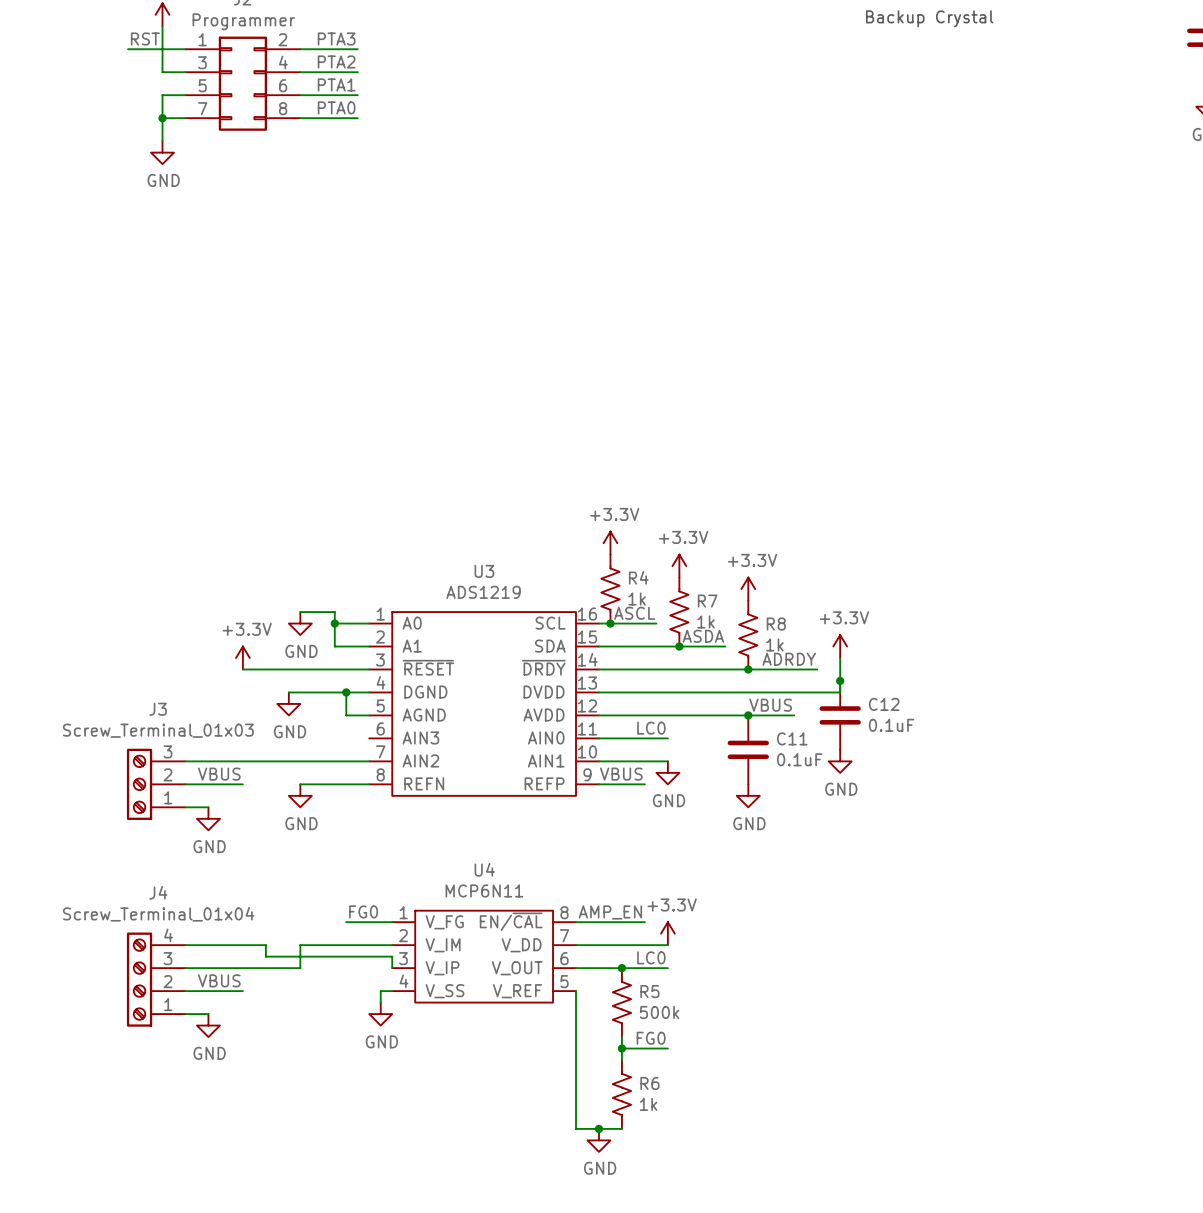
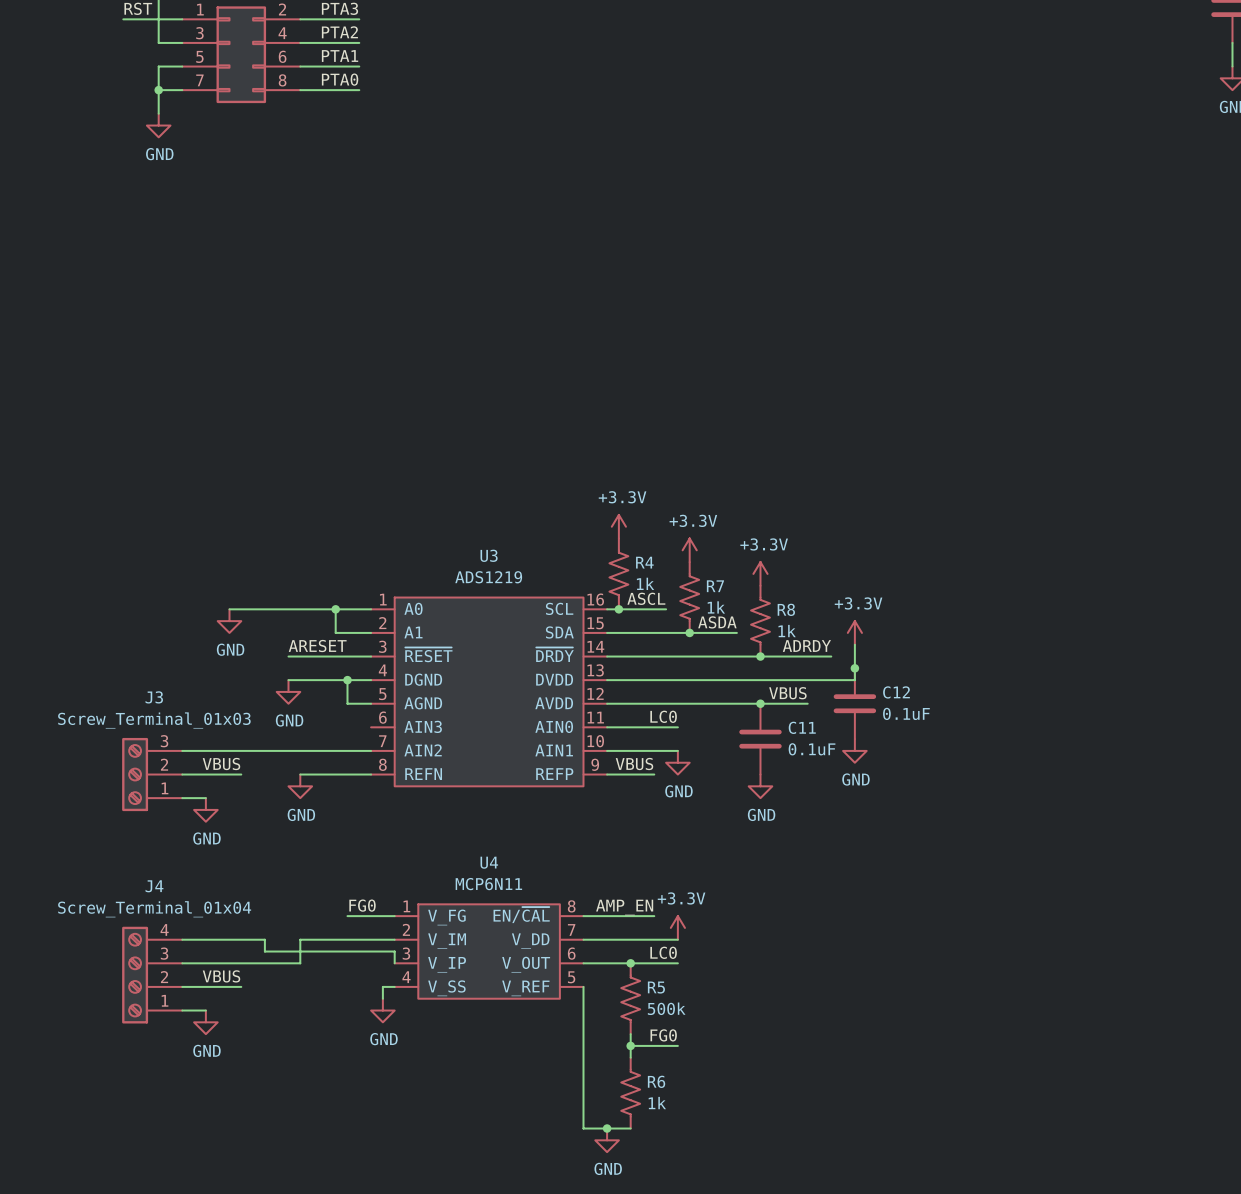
wire: (300, 612) (334, 612) (334, 623) -> (229, 609) (335, 609)
power symbol position: GND (300, 623) -> GND (229, 621)
power symbol: +3.3V (242, 658) -> none
label: none -> ARESET (317, 646)
wire: (242, 669) (288, 669) -> none

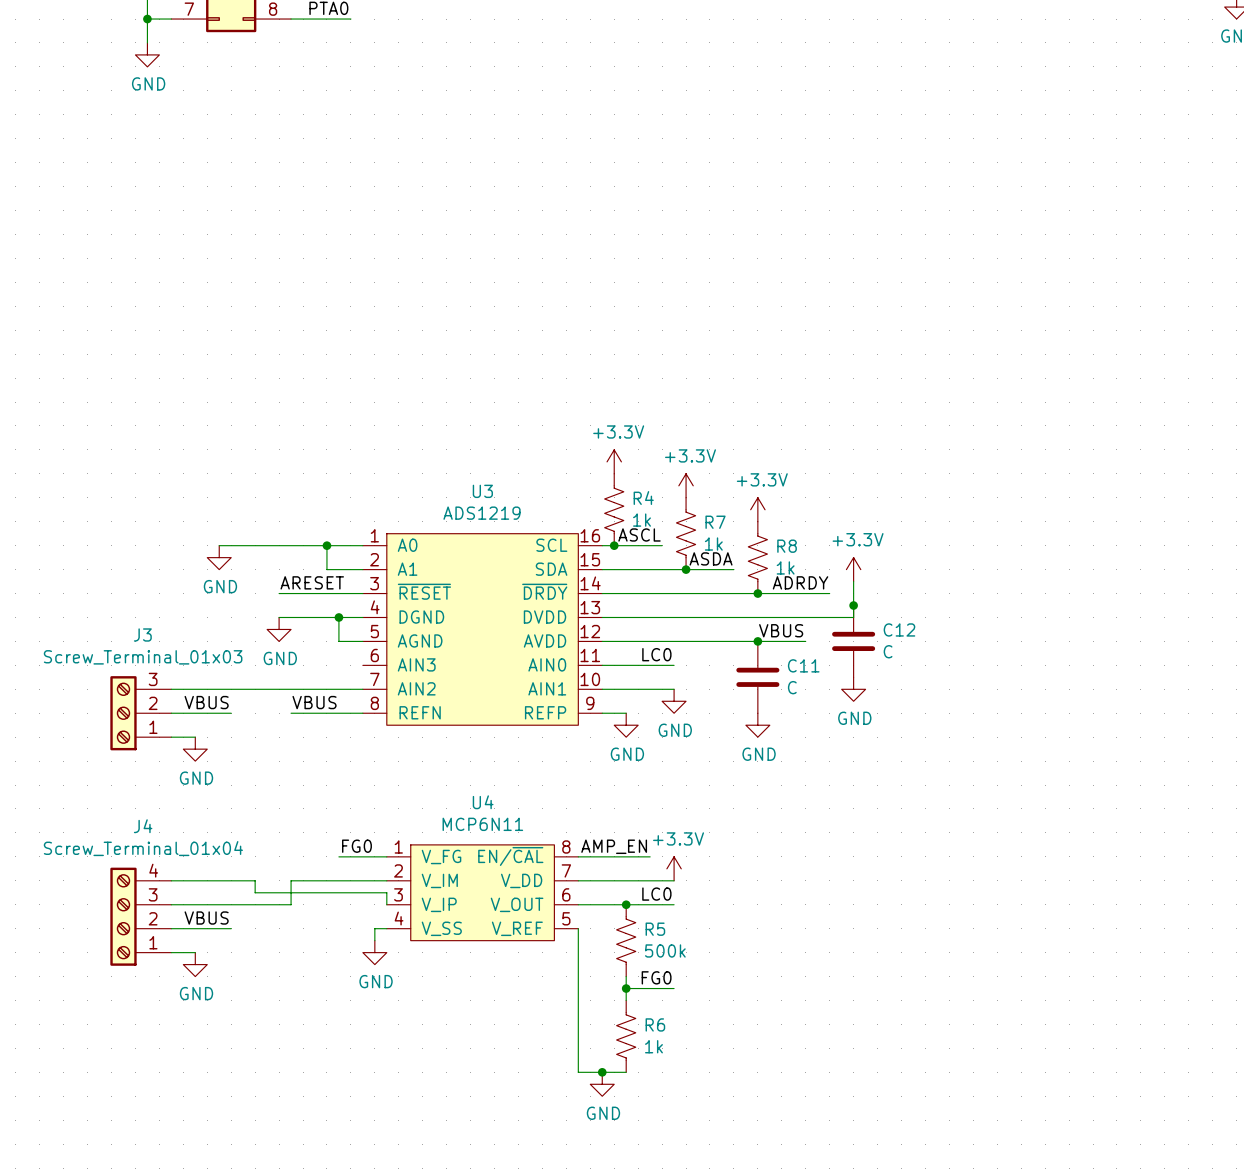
C12 value: 0.1uF (906, 713) -> C (888, 651)
C11 value: 0.1uF (812, 749) -> C (792, 687)
label: none -> VBUS (314, 702)
label: VBUS (634, 764) -> none
wire: (630, 774) (654, 774) -> none
power symbol: GND (300, 786) -> none
power symbol: none -> GND (626, 725)

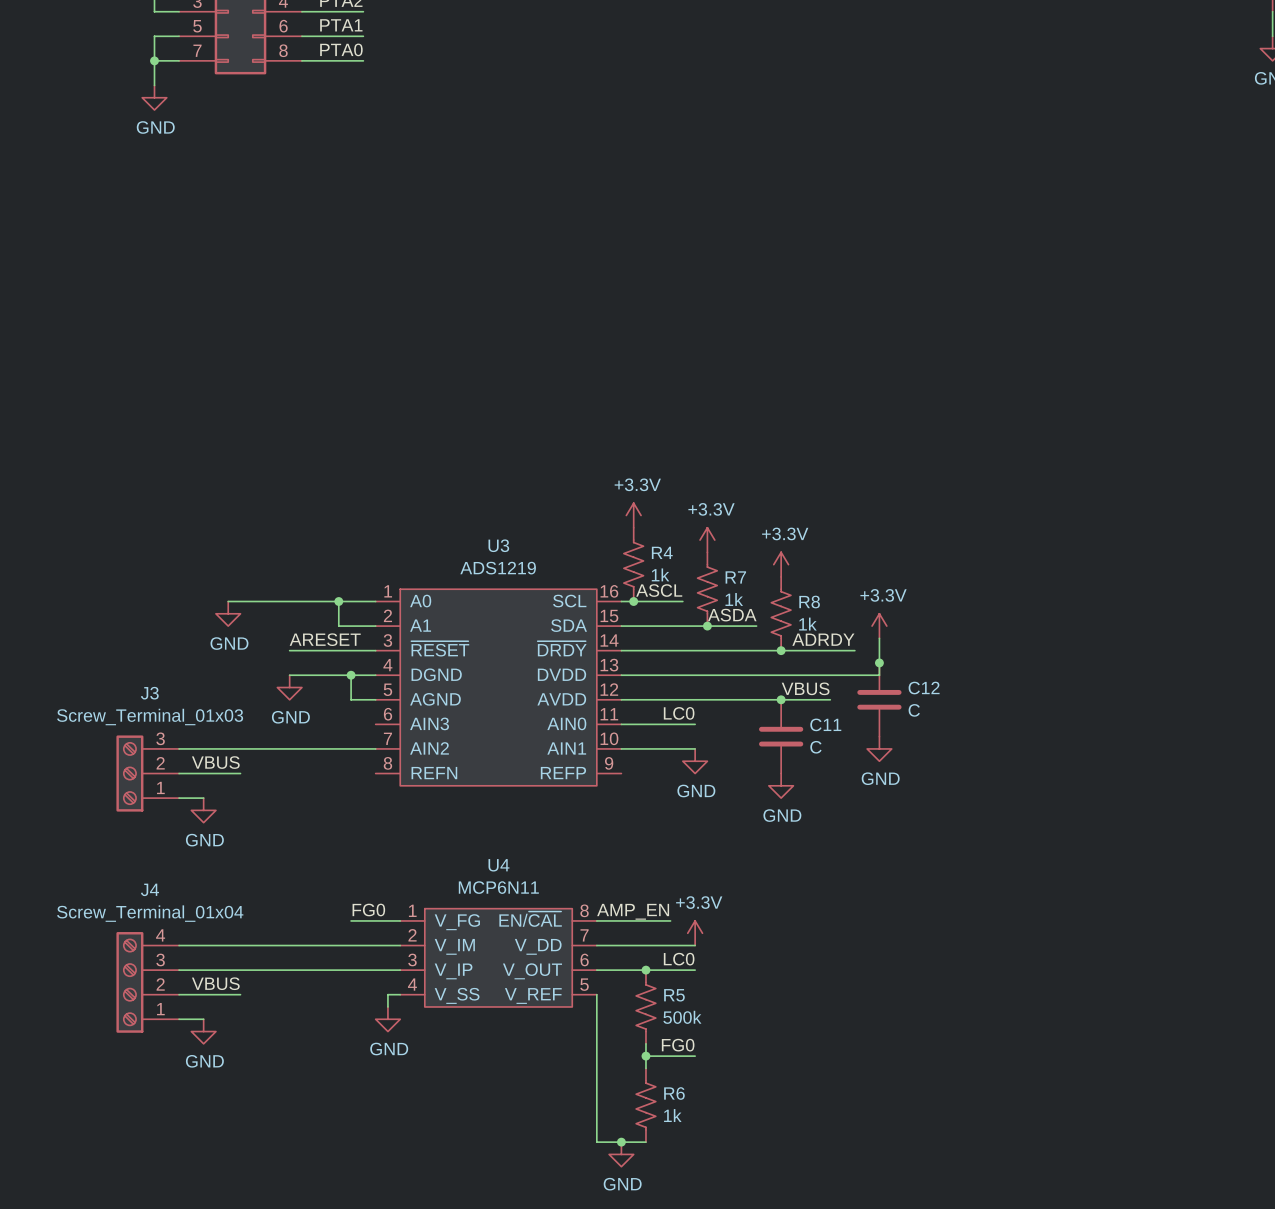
label: VBUS (314, 702) -> none
wire: (291, 713) (362, 713) -> none
wire: (602, 713) (626, 713) -> none
power symbol: GND (626, 725) -> none
wire: (255, 880) (255, 892) (386, 892) (386, 904) -> (301, 970) (400, 970)
wire: (291, 880) (291, 904) -> (301, 945) (265, 945)

